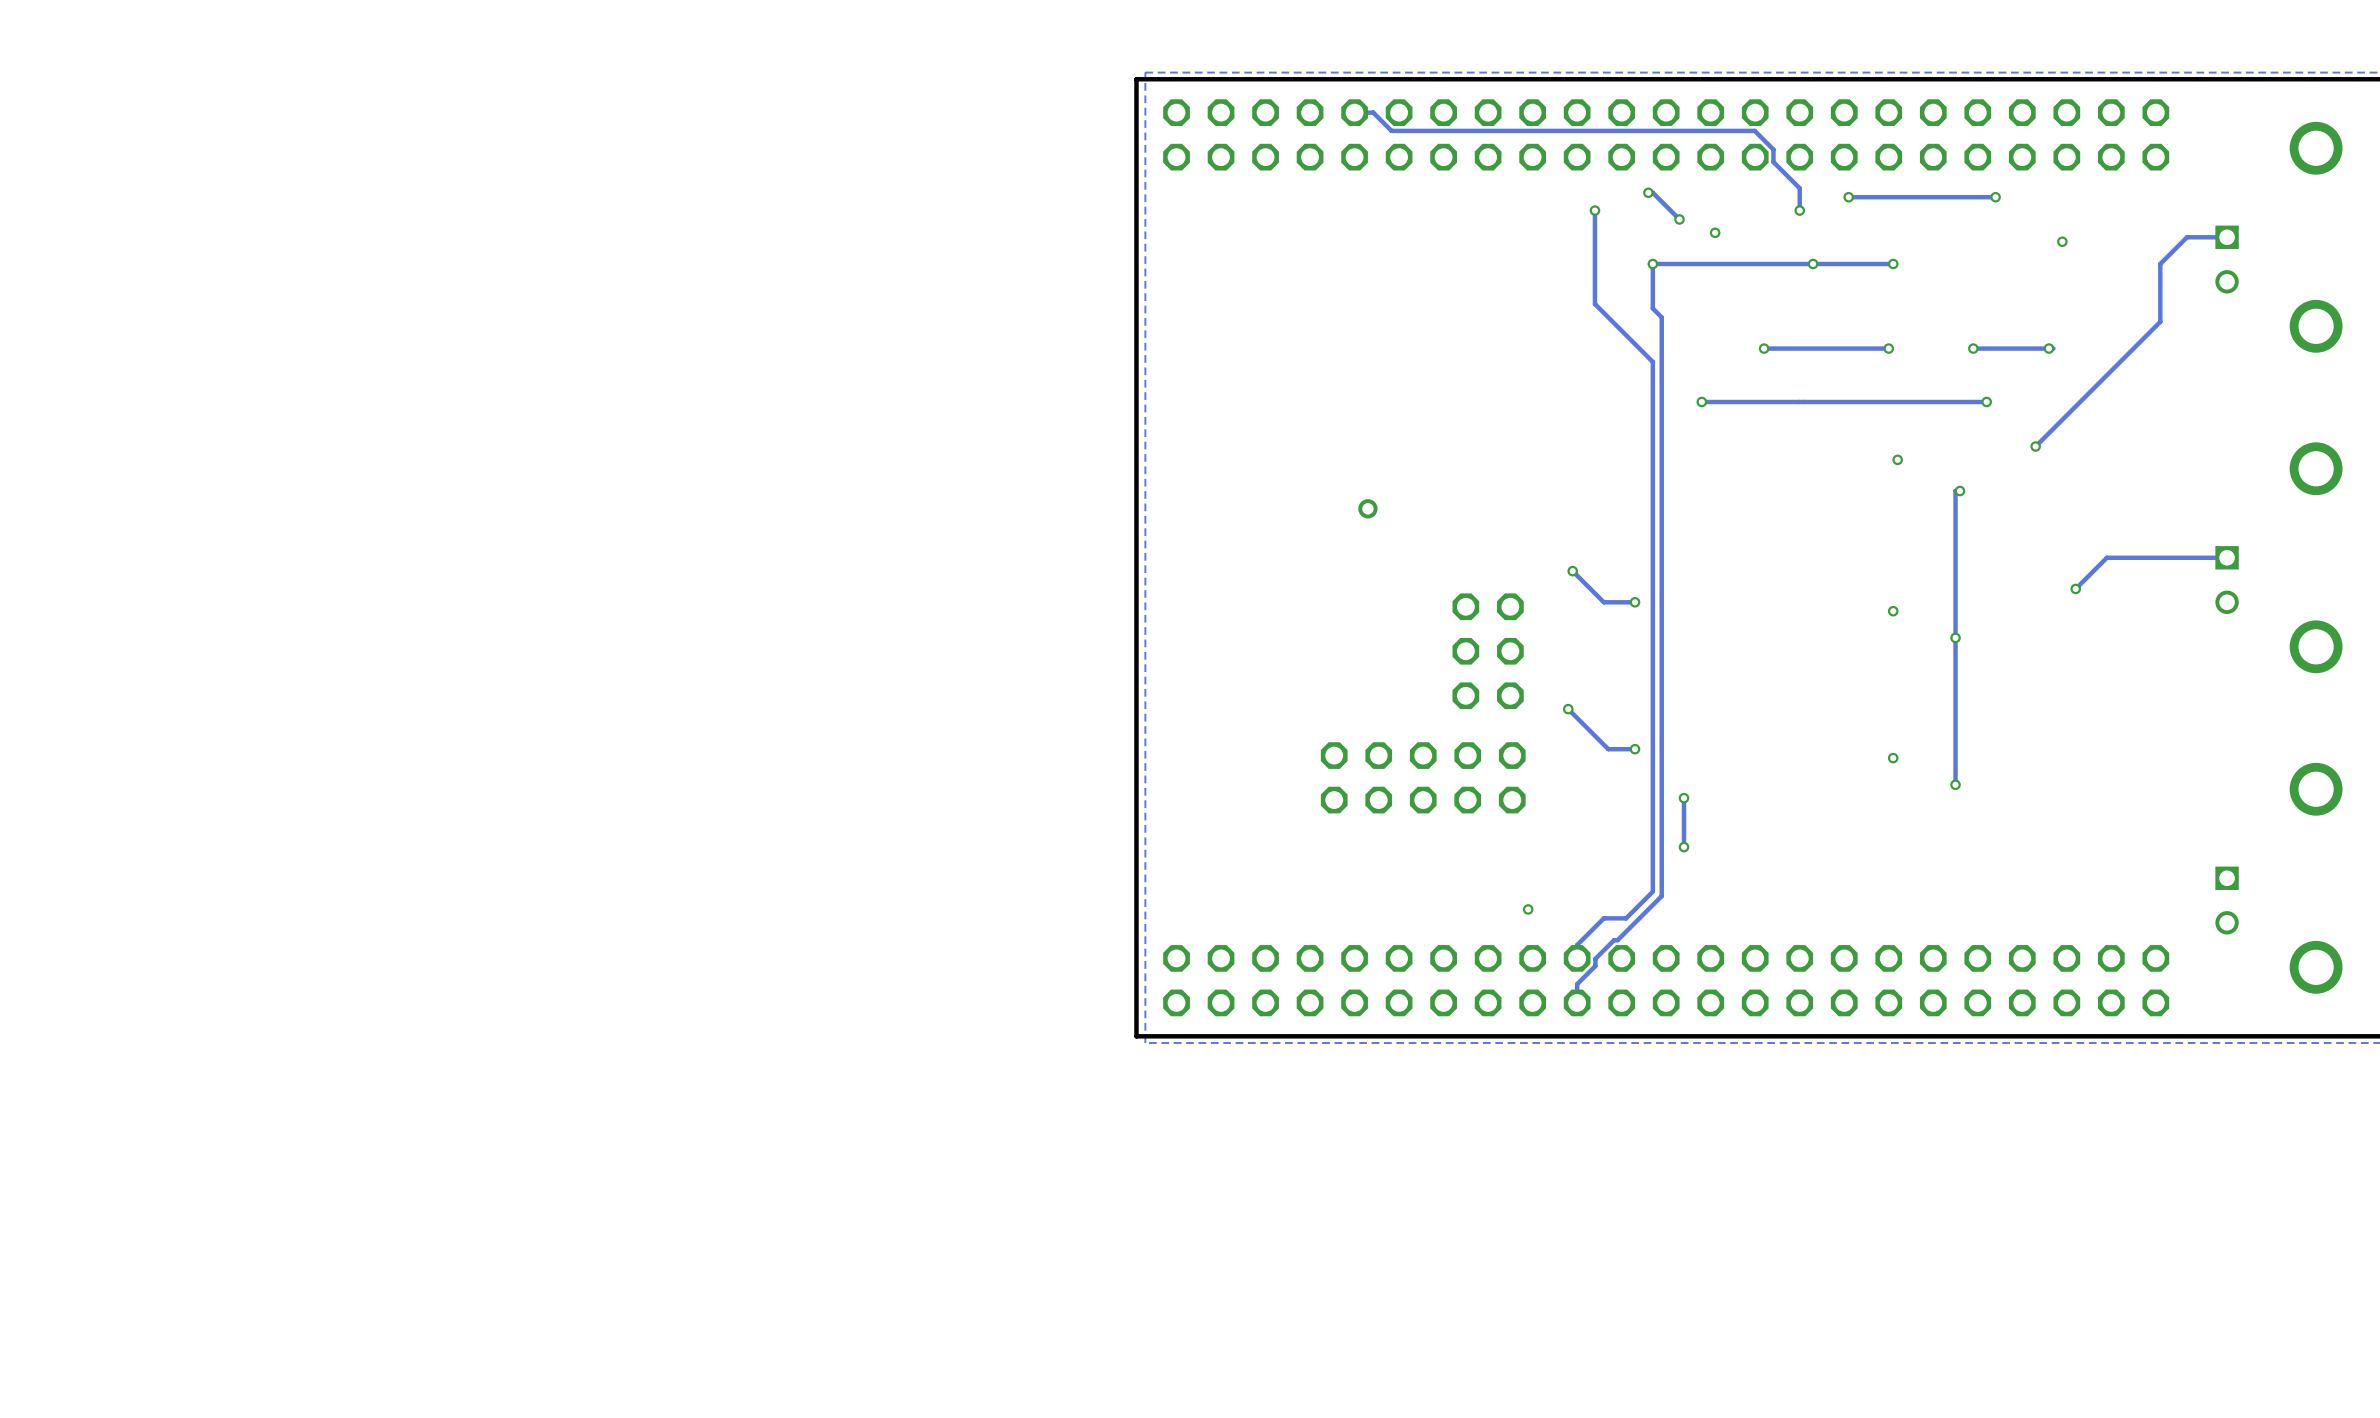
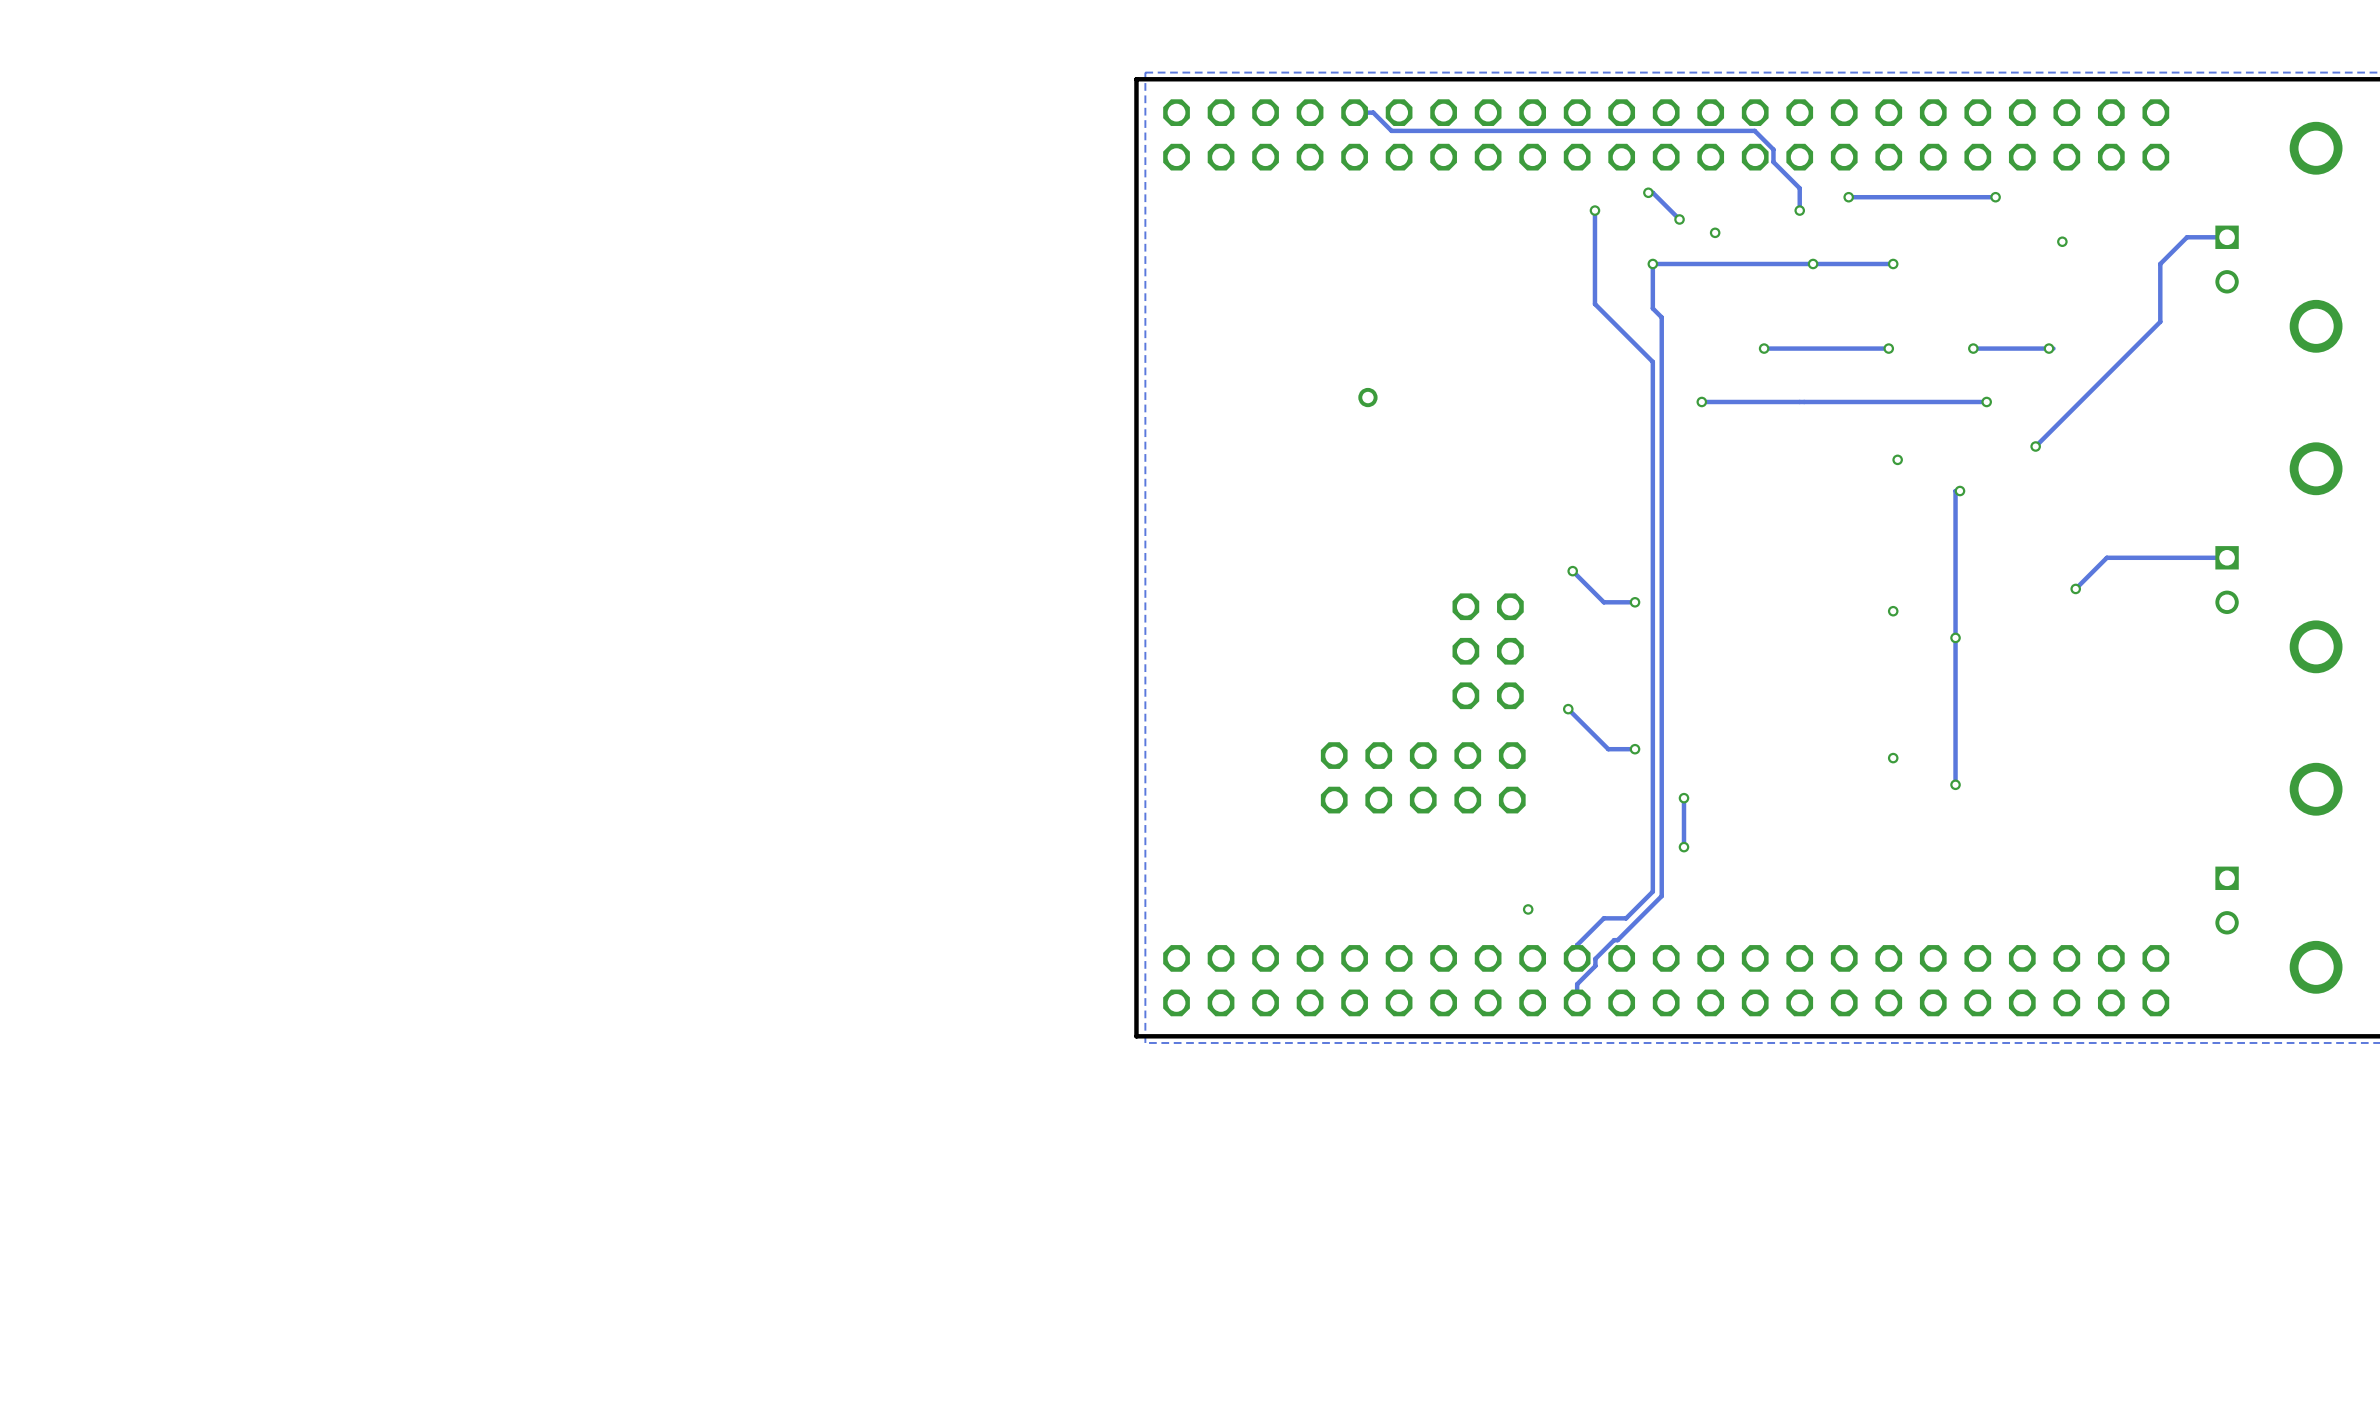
via: none -> (1367, 397)
via: (1367, 508) -> none

